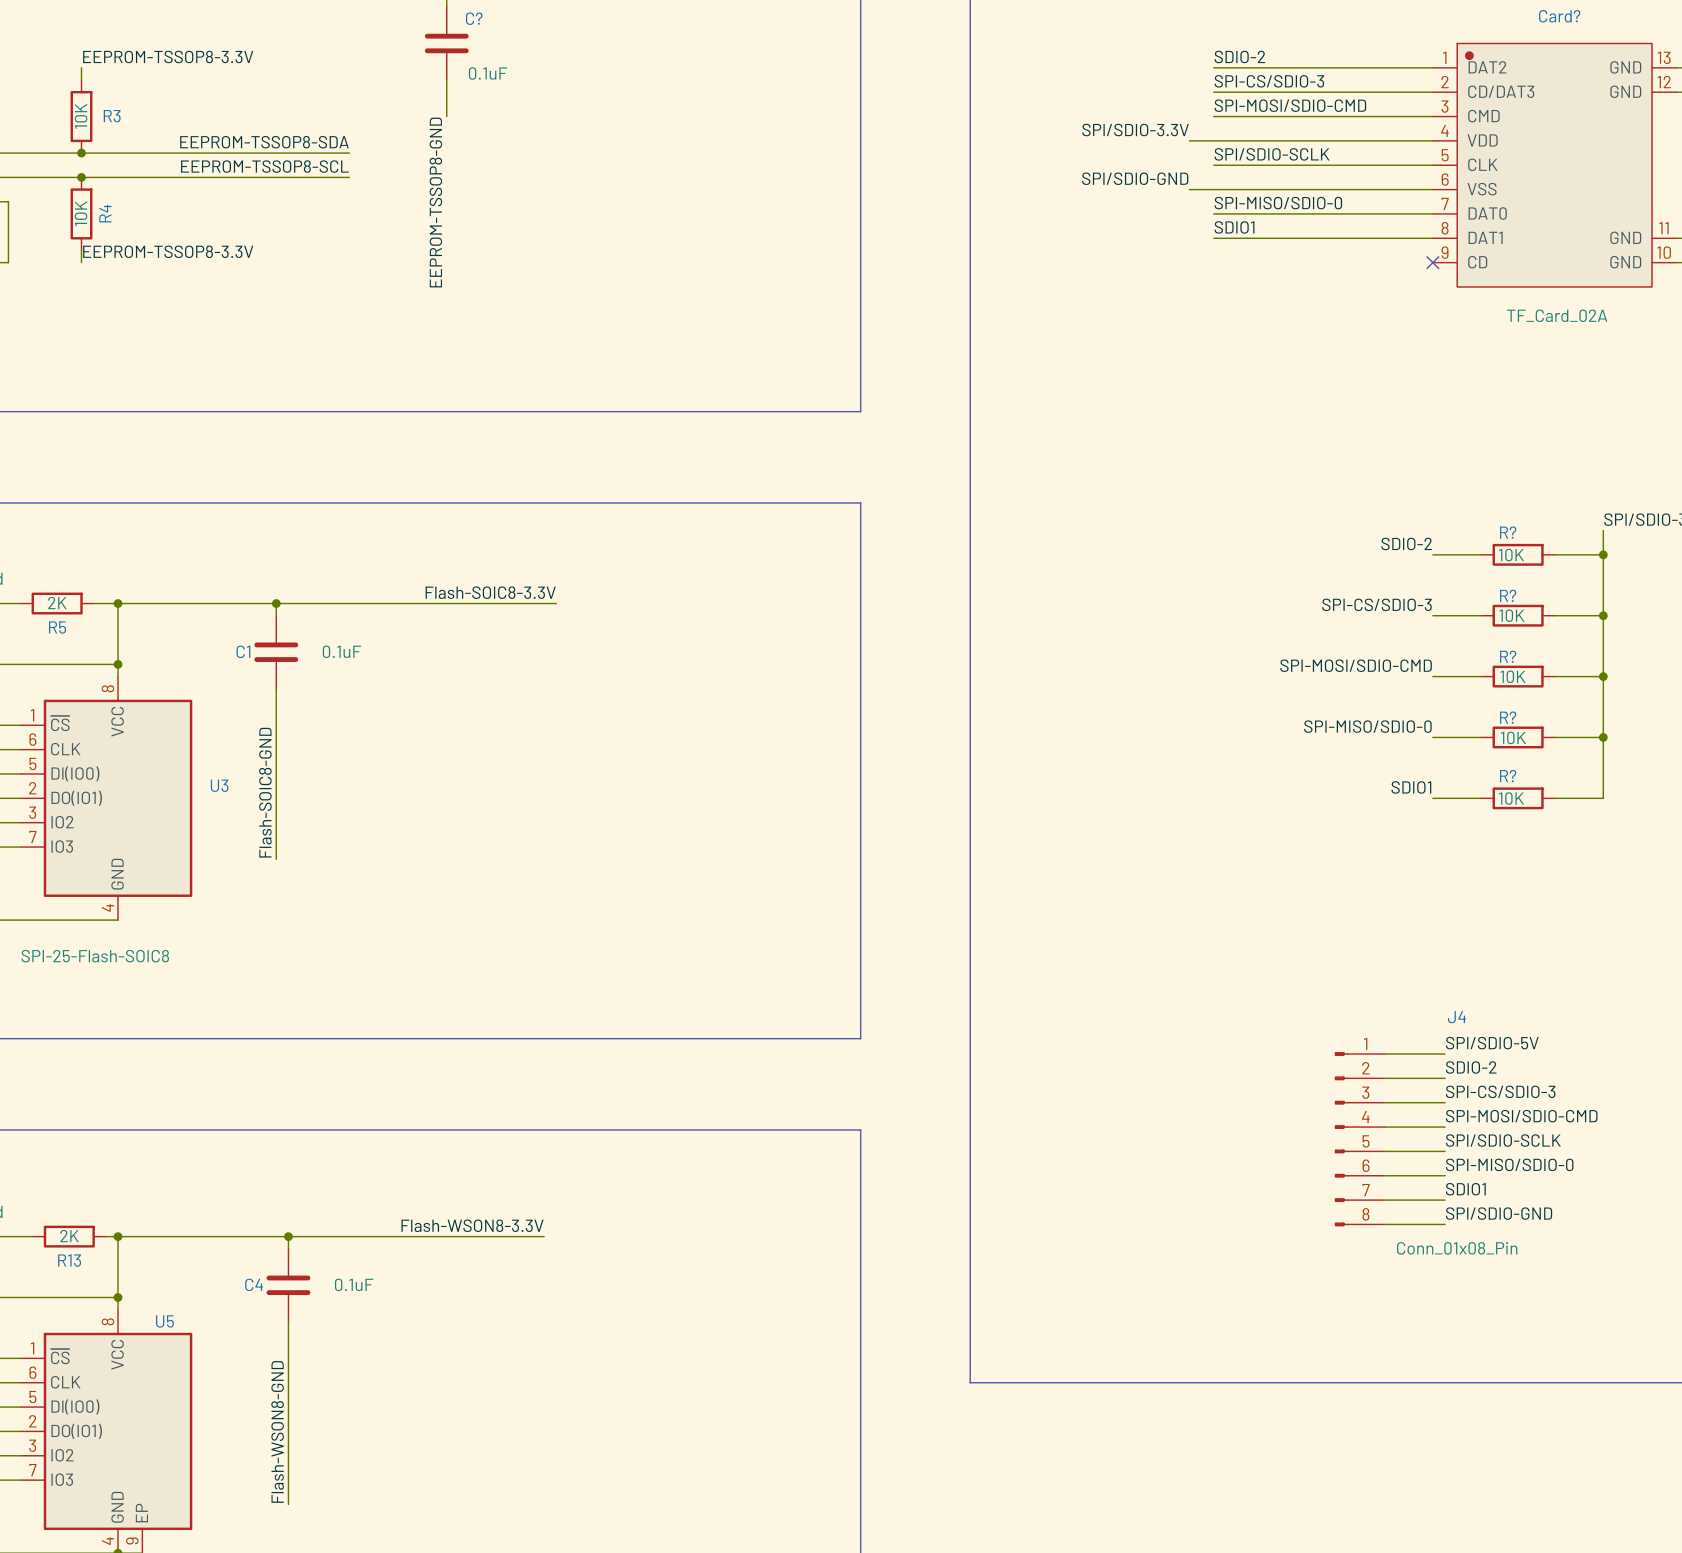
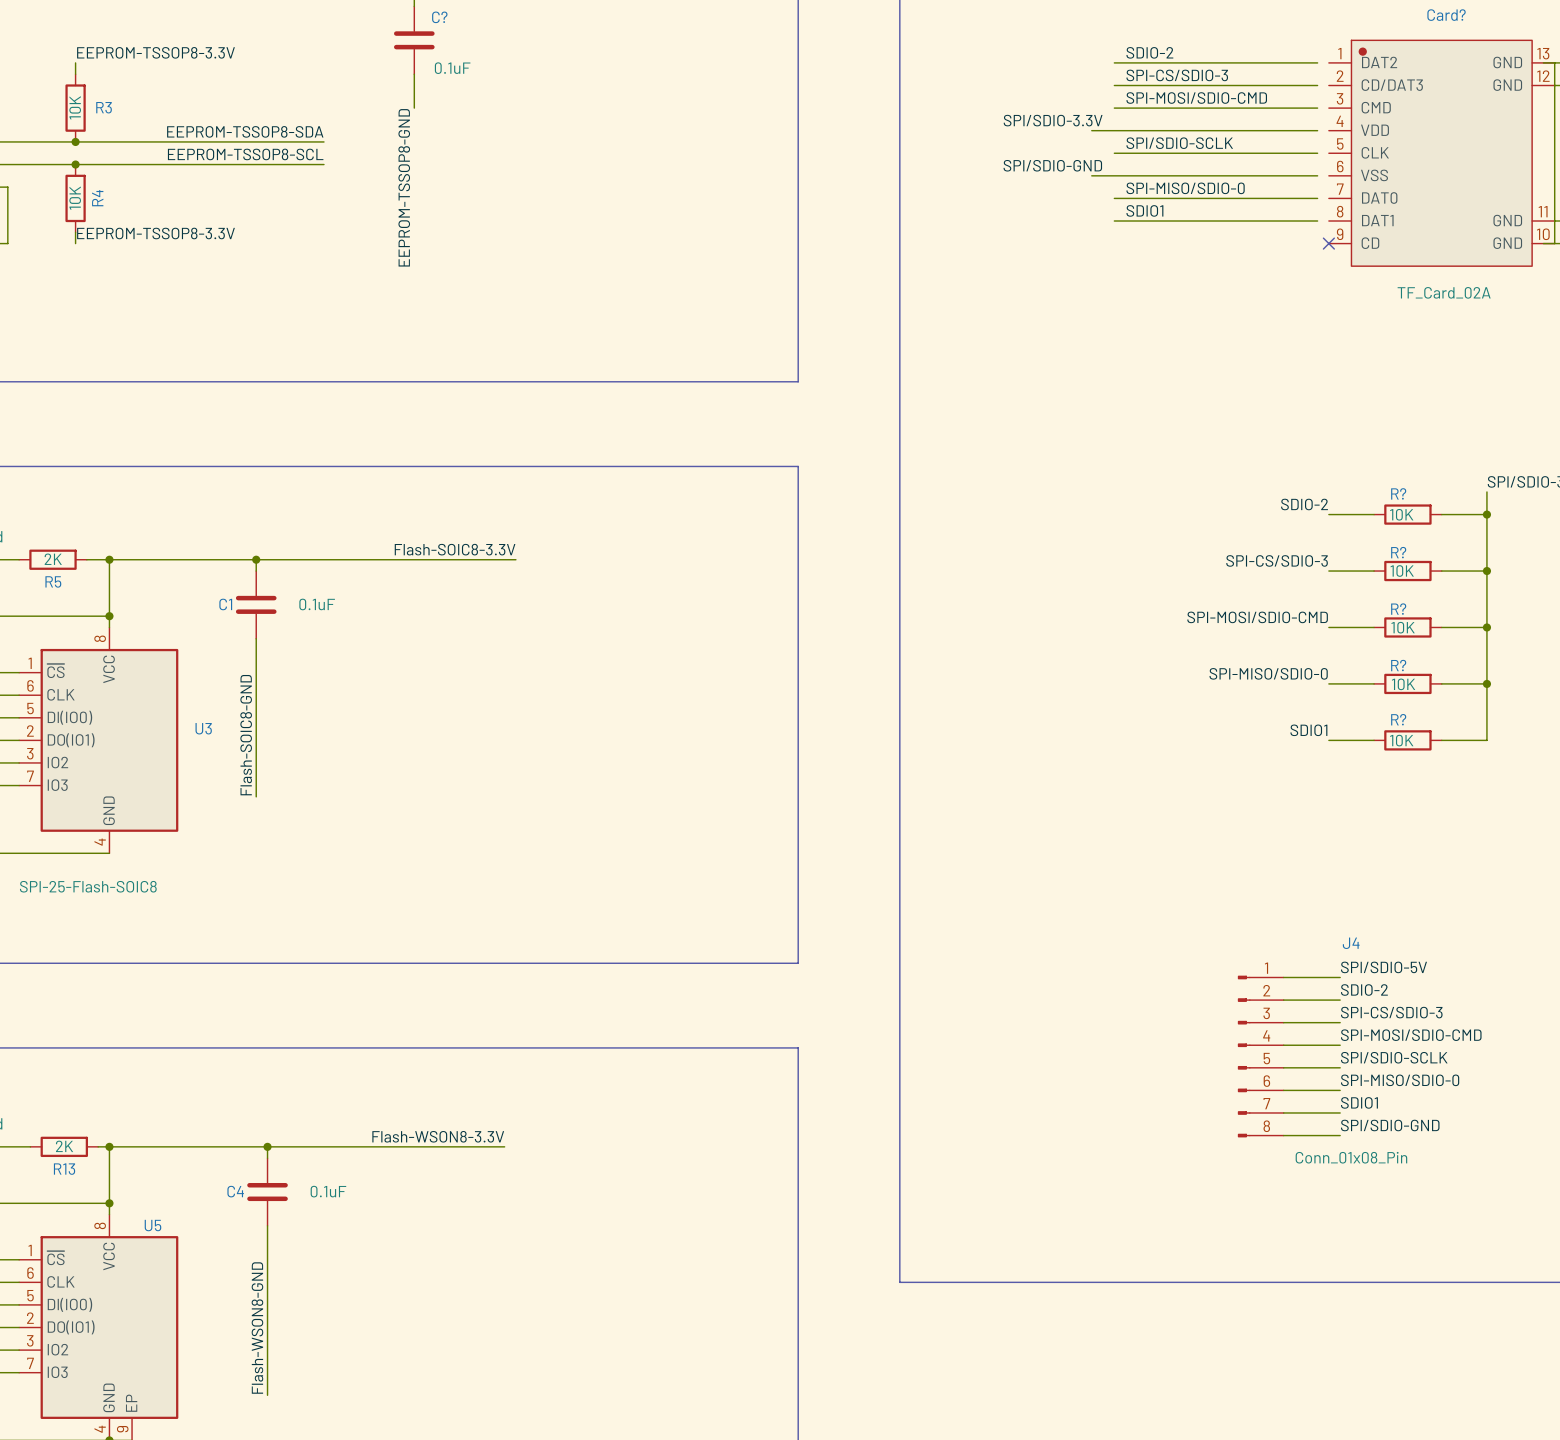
wire: (1420, 67) (1432, 67) -> (1114, 62) (1125, 62)
wire: none -> (1543, 62) (1554, 62) (1554, 243) (1543, 243)
wire: (1420, 92) (1432, 92) -> (1114, 85) (1125, 85)
wire: (1420, 116) (1432, 116) -> (1114, 108) (1125, 108)
wire: none -> (1091, 130) (1103, 130)
wire: (1420, 140) (1432, 140) -> none
wire: (1420, 165) (1432, 165) -> (1114, 153) (1125, 153)
wire: none -> (1091, 175) (1103, 175)
wire: (1420, 189) (1432, 189) -> none
wire: (1420, 213) (1432, 213) -> (1114, 198) (1125, 198)
wire: (1420, 238) (1432, 238) -> (1114, 221) (1125, 221)

